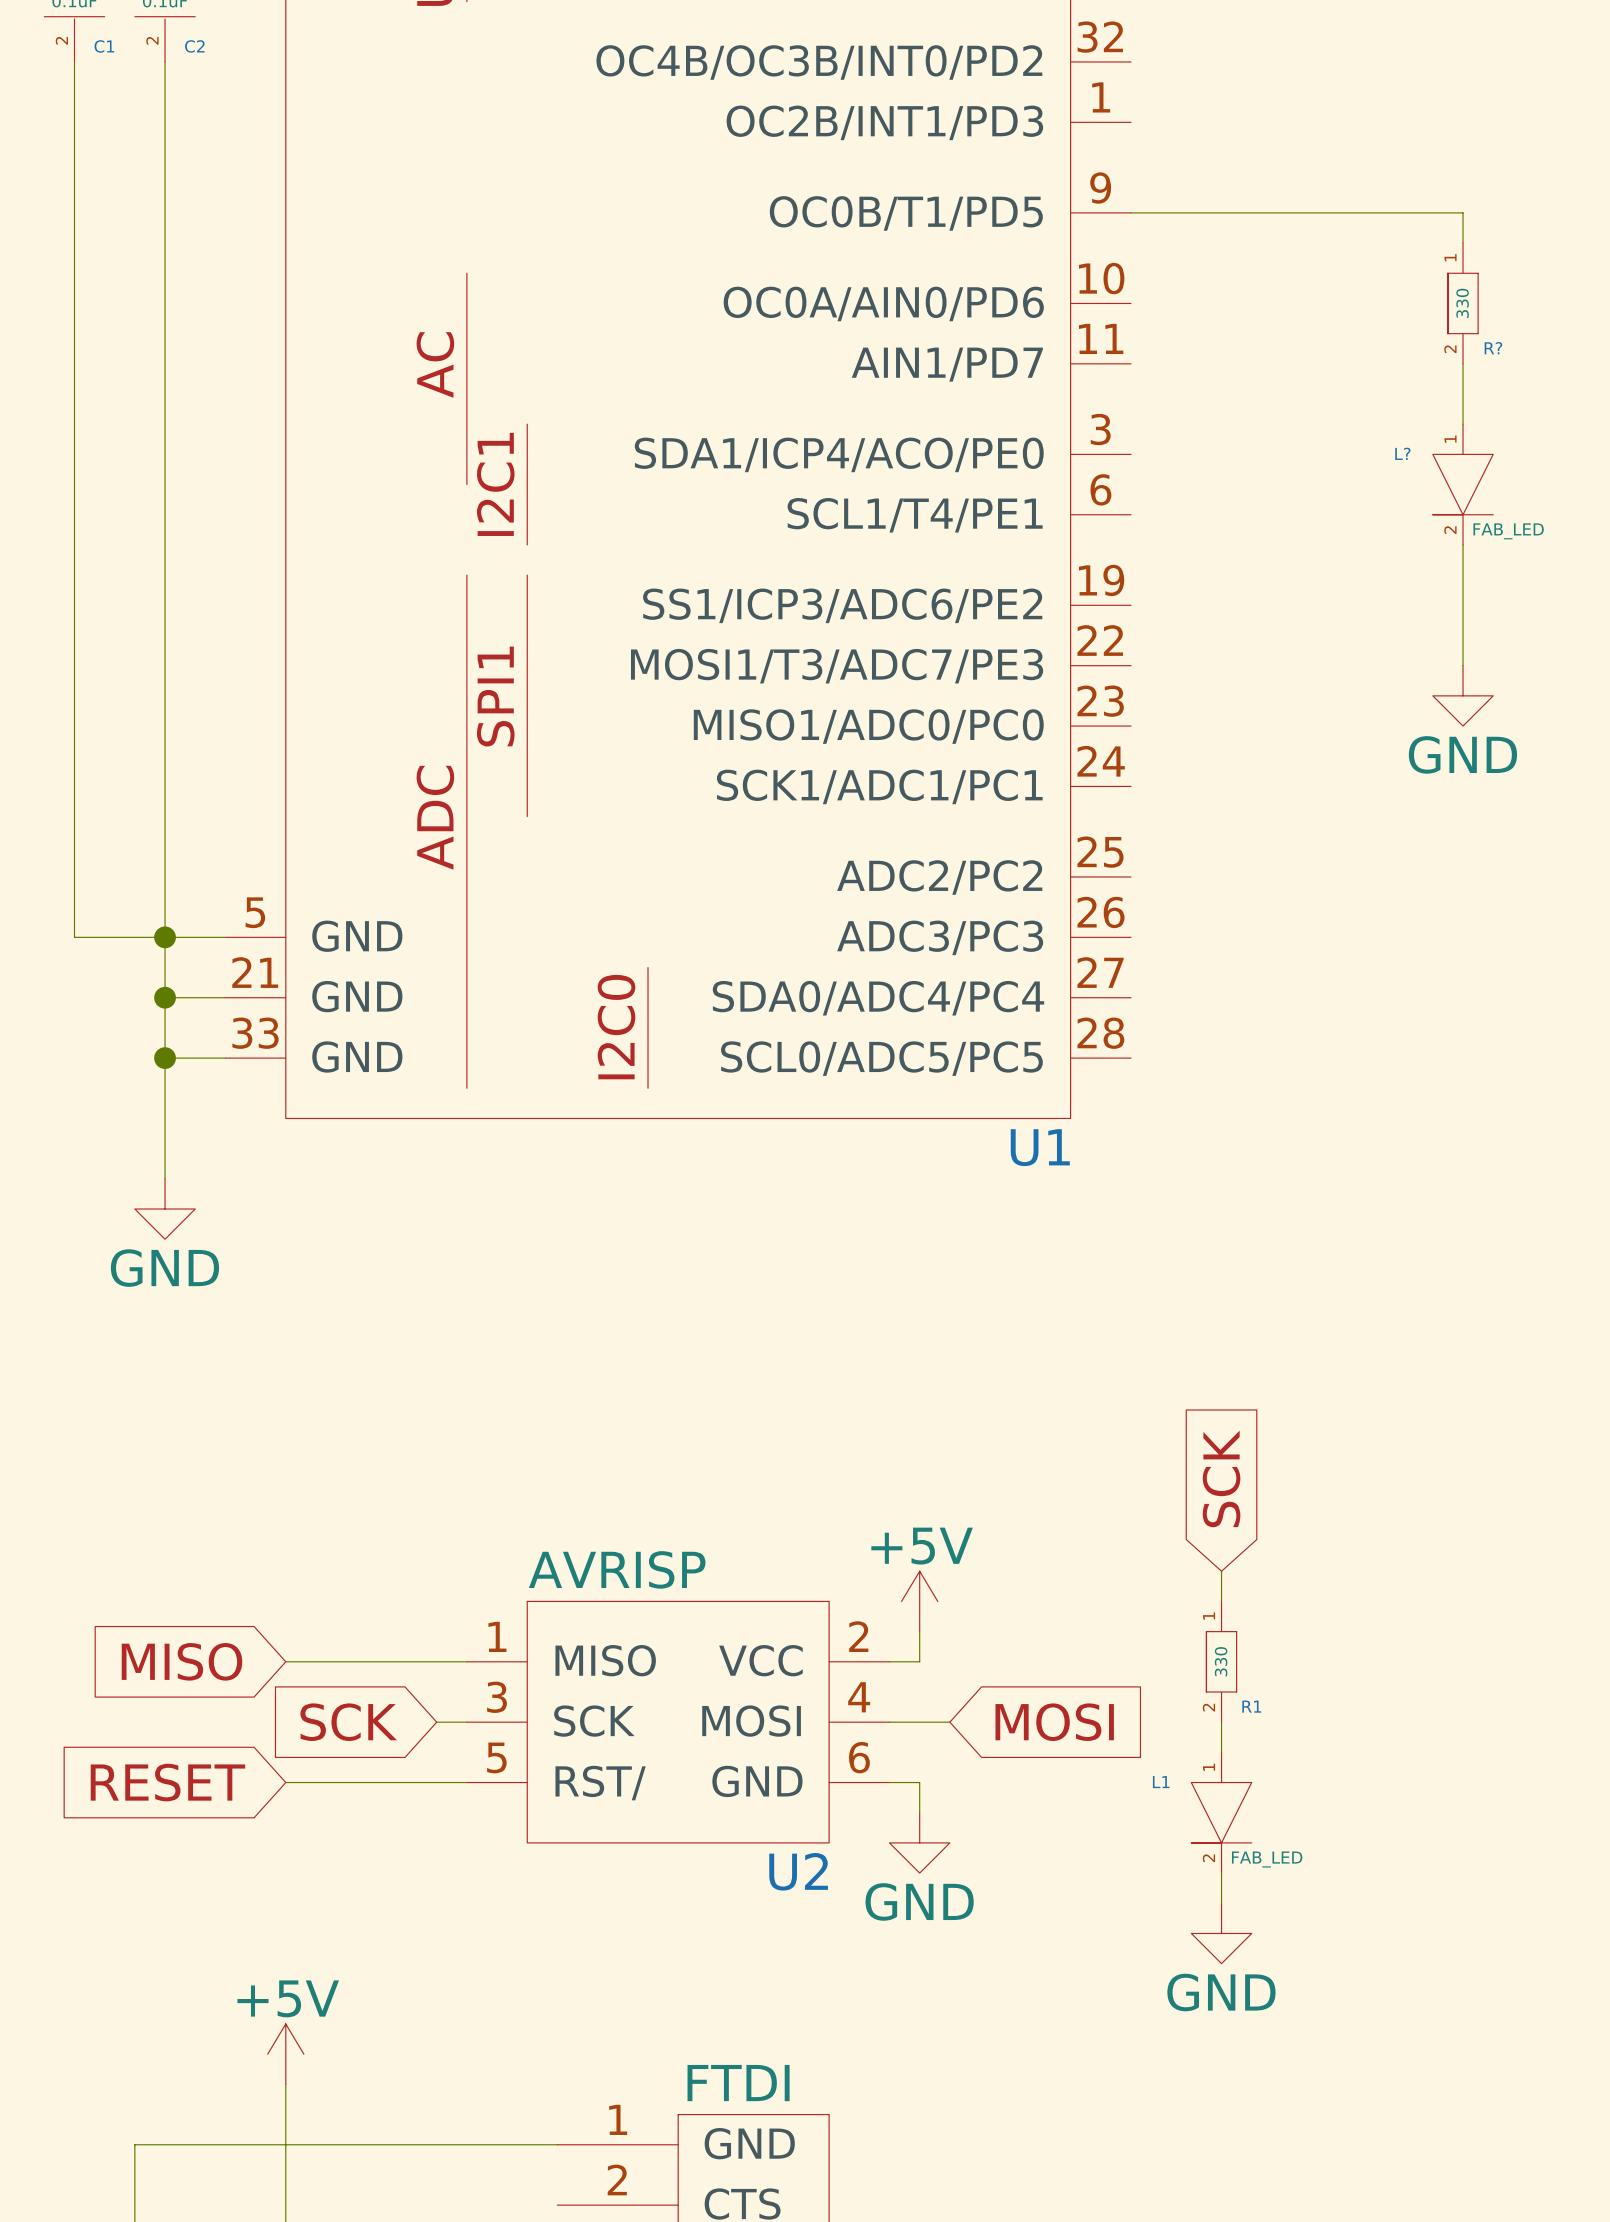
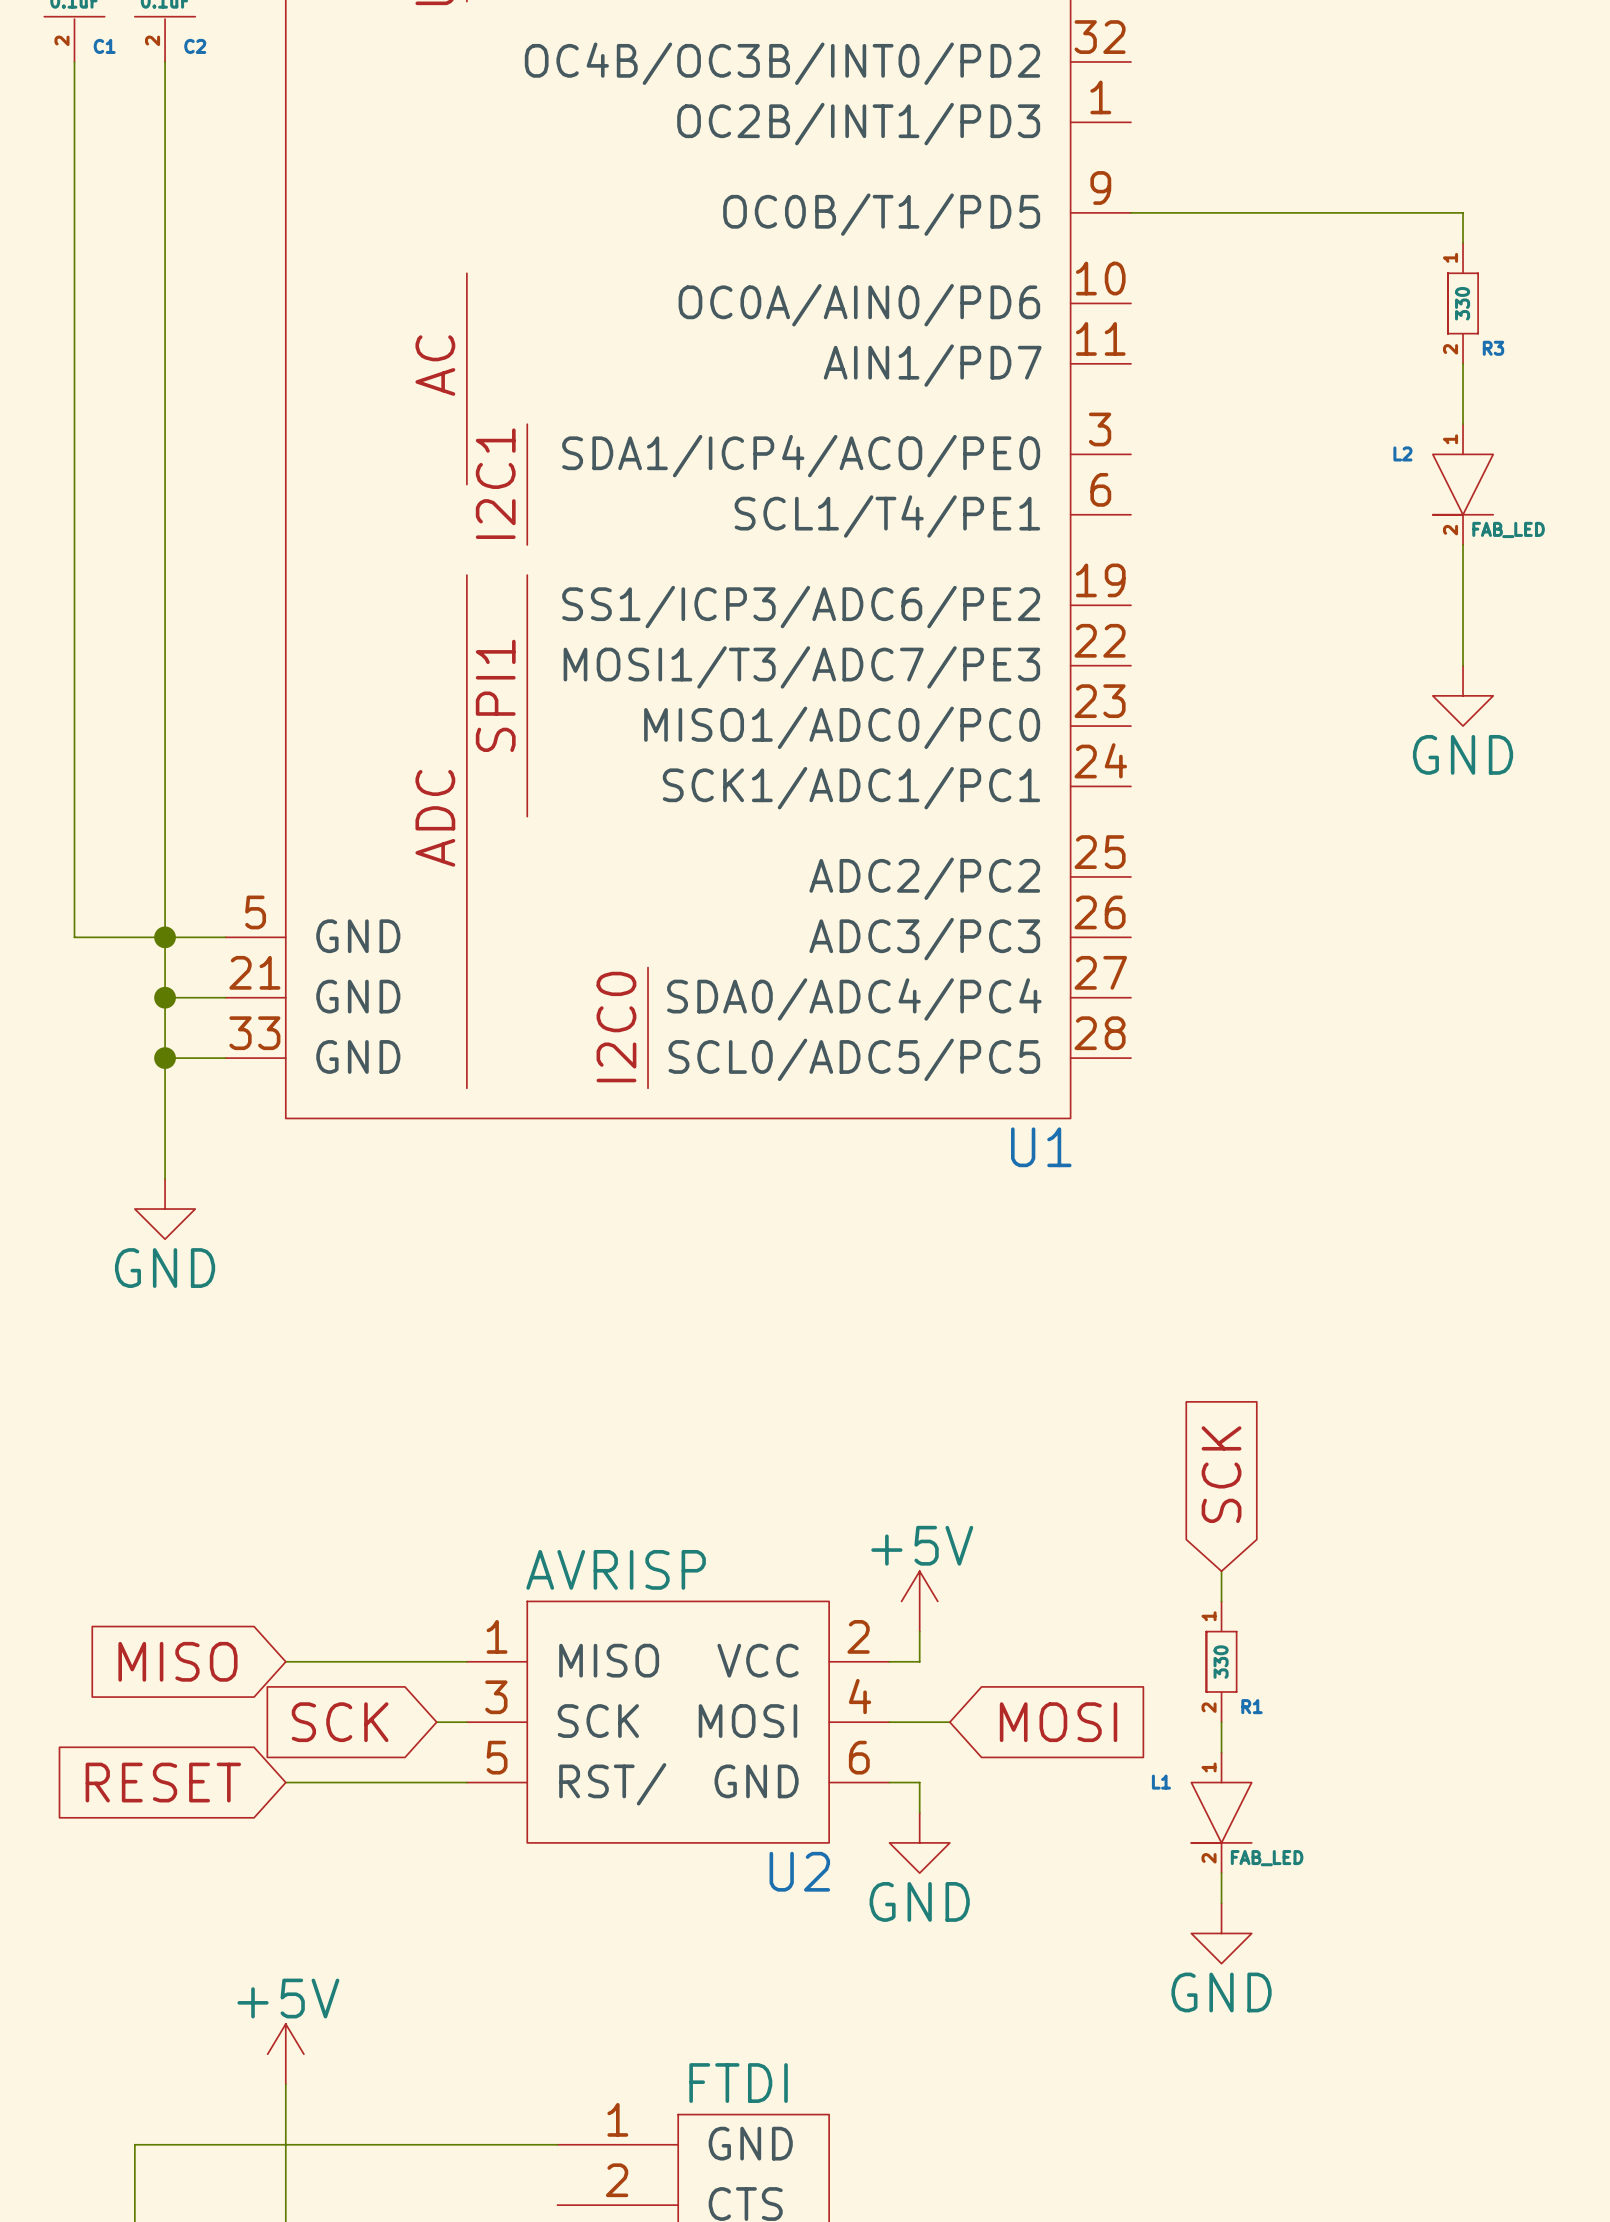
R? name: R? (1493, 348) -> R3 (1493, 348)
L? name: L? (1402, 453) -> L2 (1402, 453)

